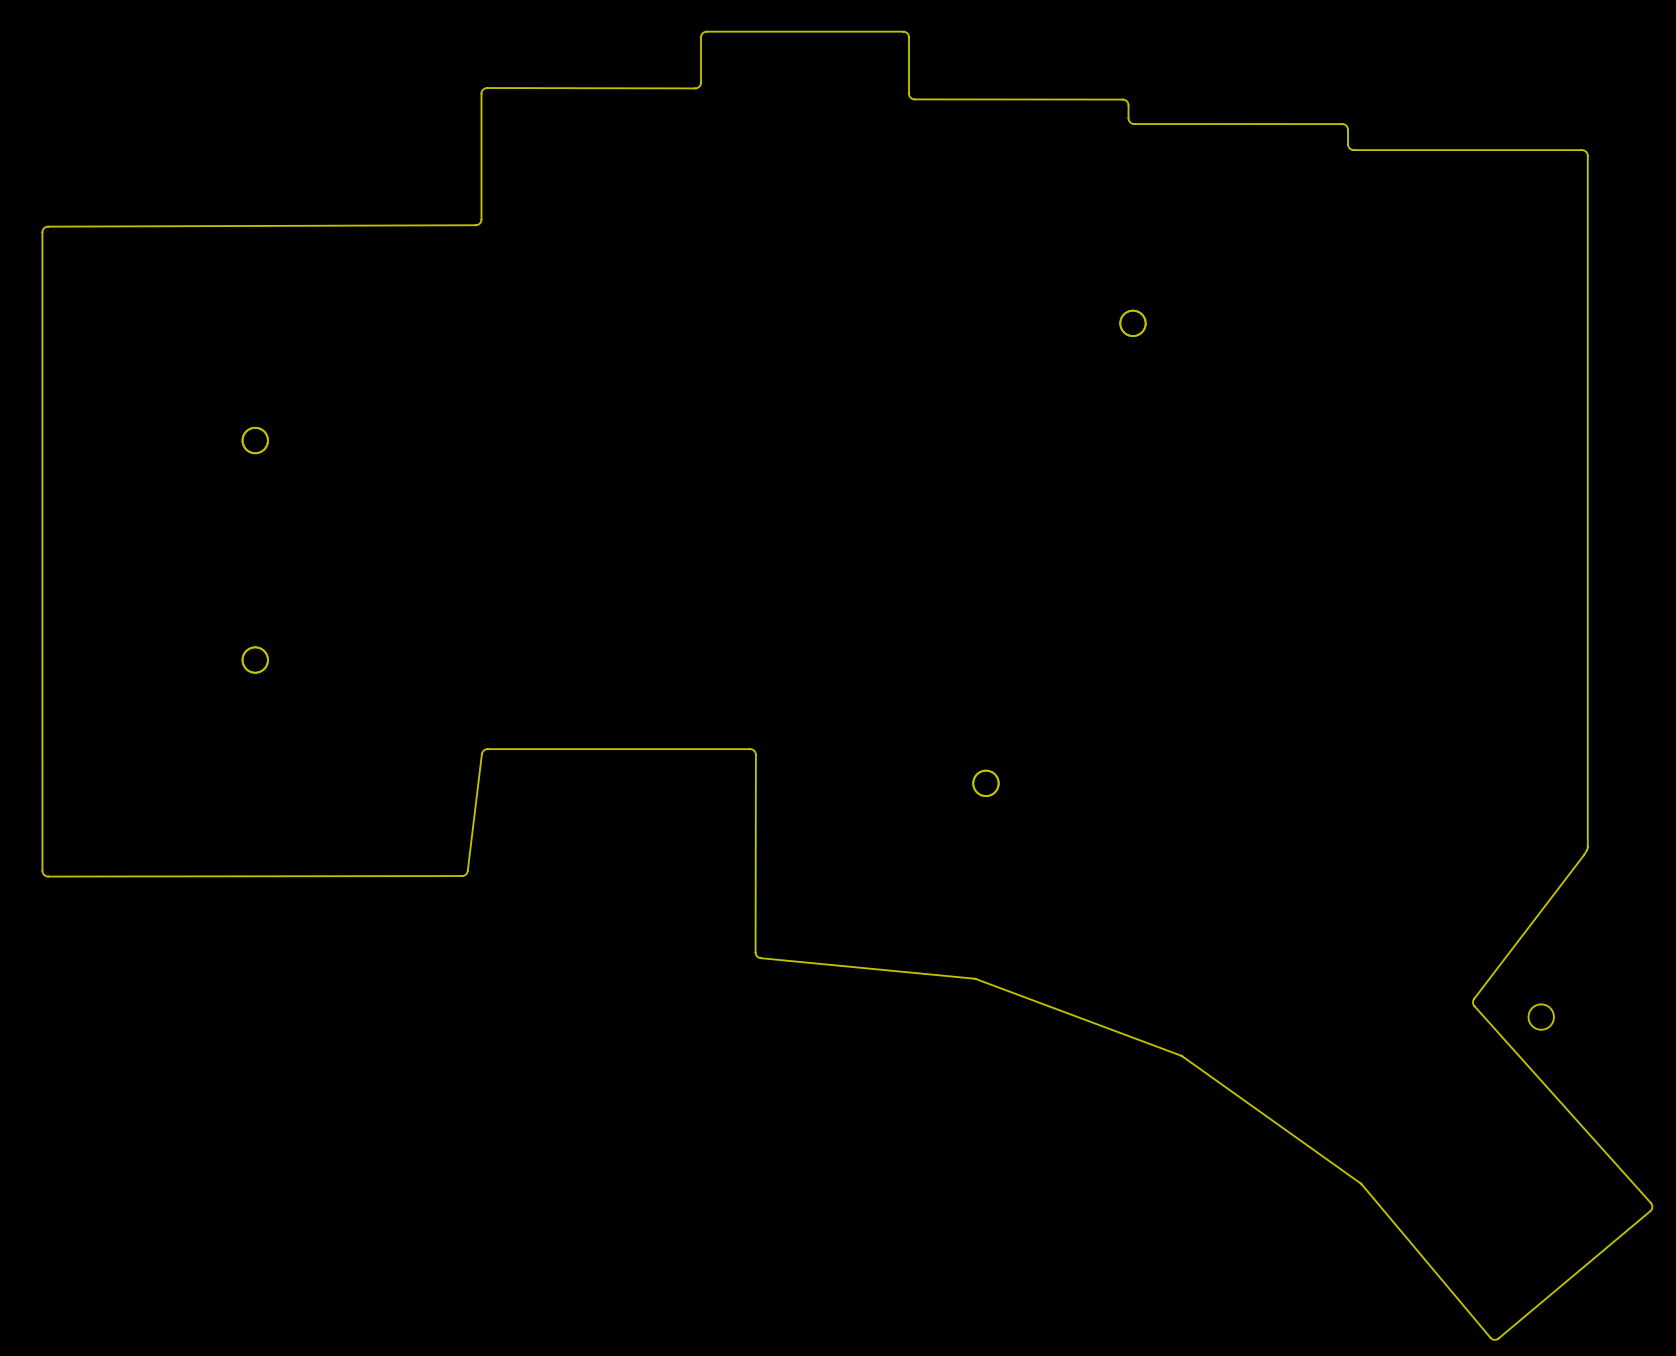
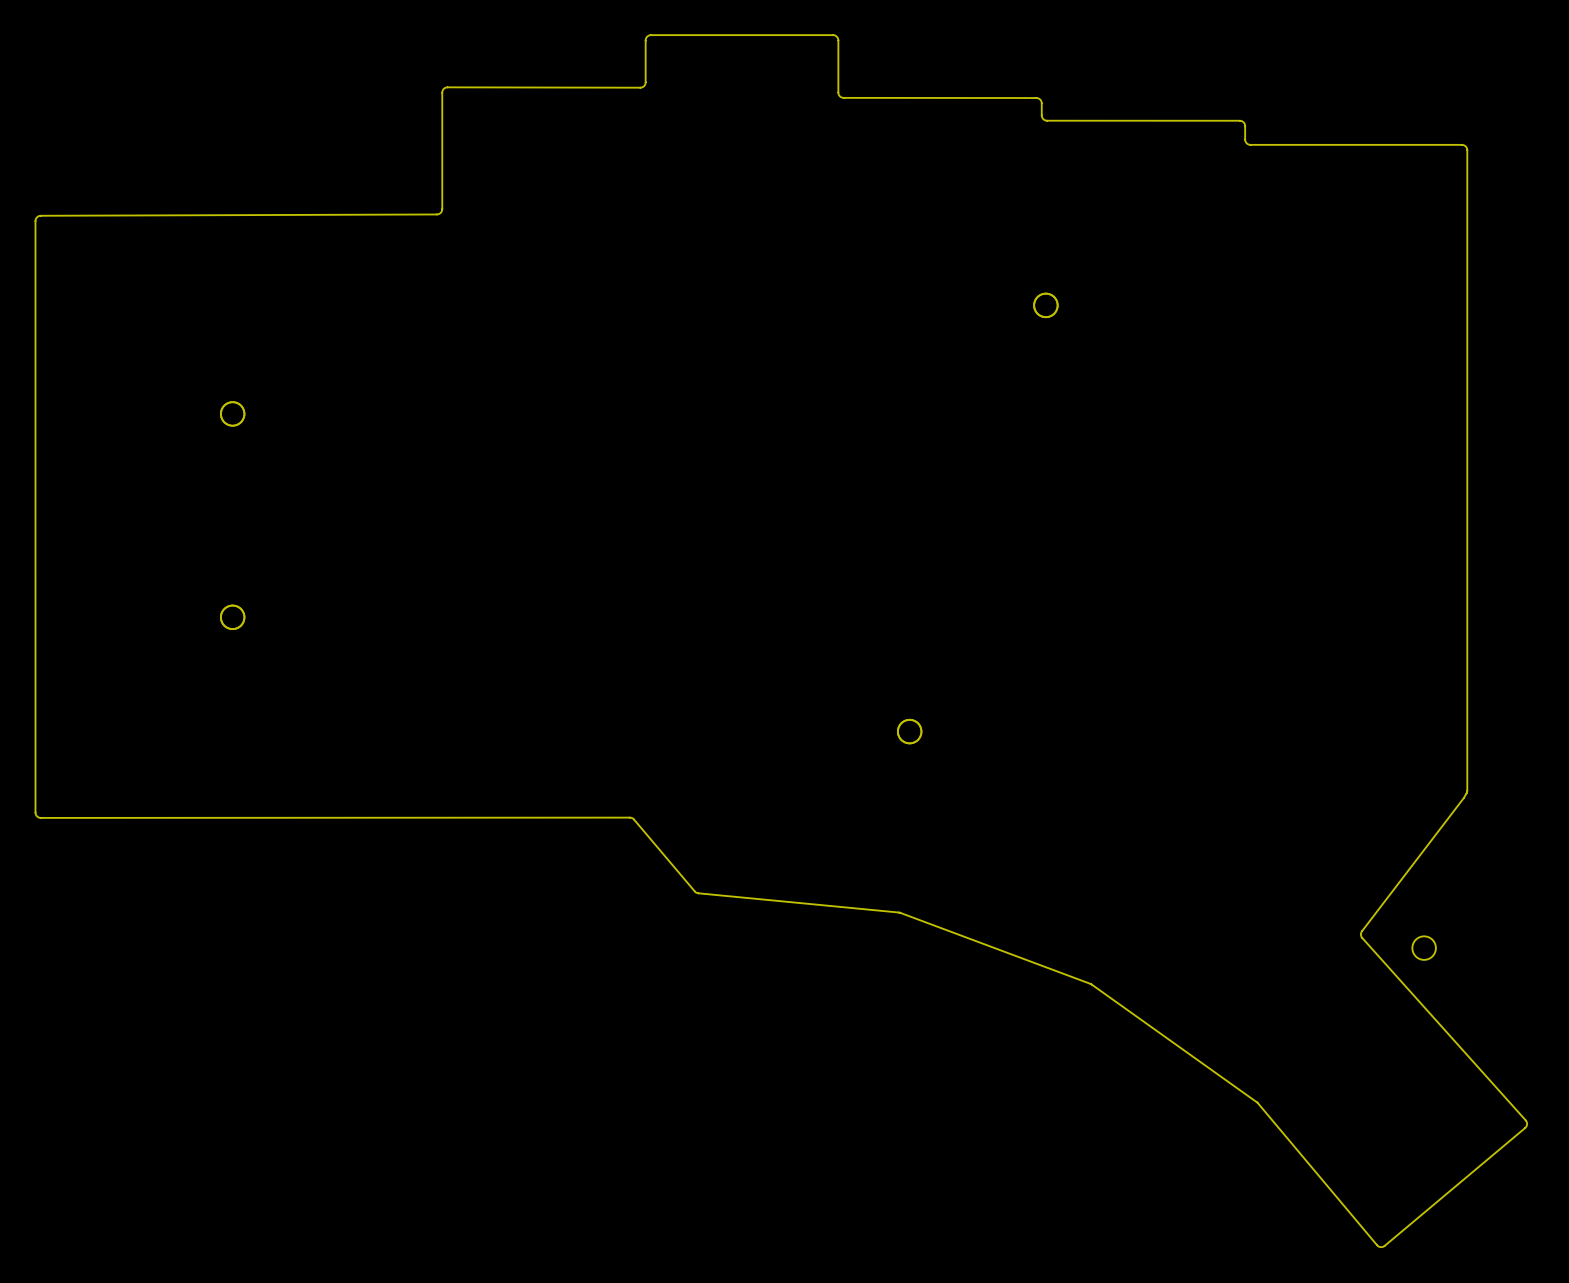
board edge: (48, 876) (462, 876) (467, 870) (481, 754) (485, 749) (750, 749) (755, 754) (755, 952) (757, 956) (760, 958) -> (40, 817) (630, 817) (694, 891) (701, 893)

